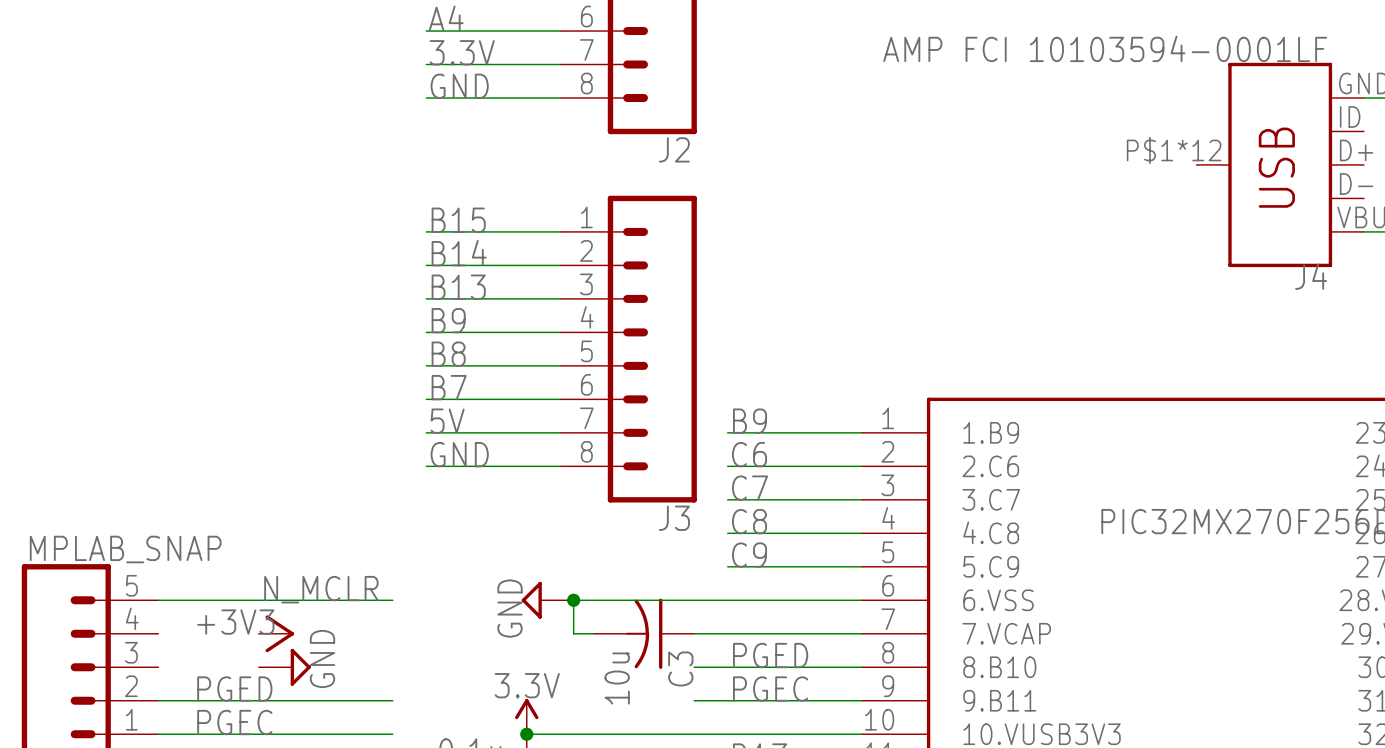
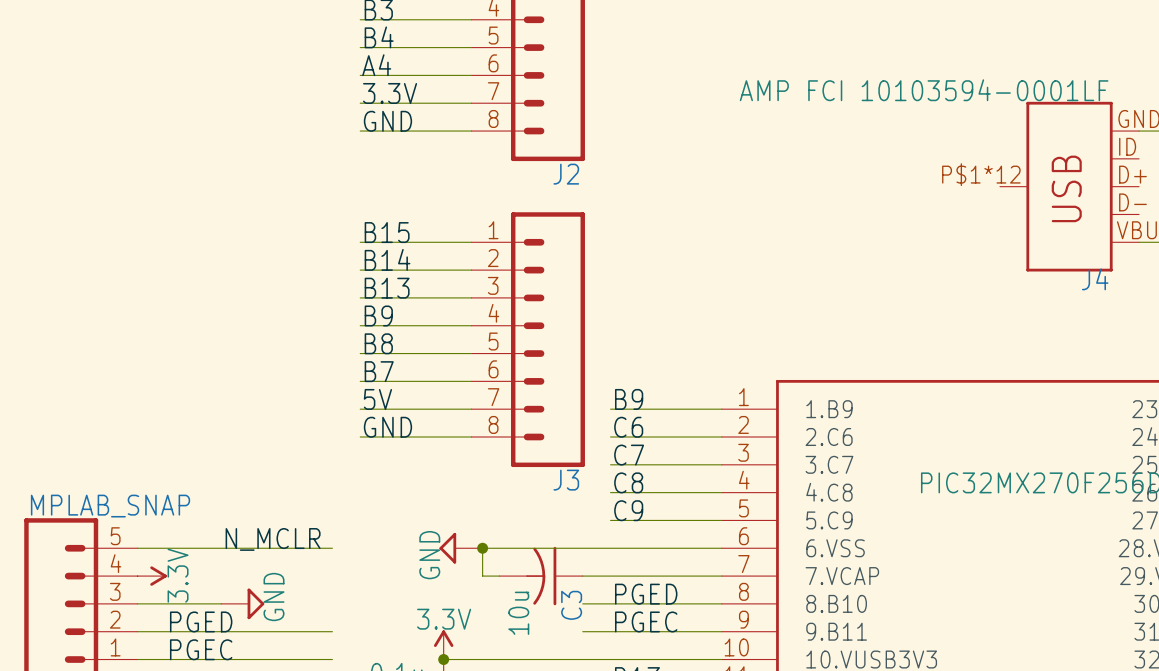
power symbol: none -> 3.3V (152, 576)
power symbol: +3V3 (276, 633) -> none
wire: none -> (137, 603) (221, 603)

